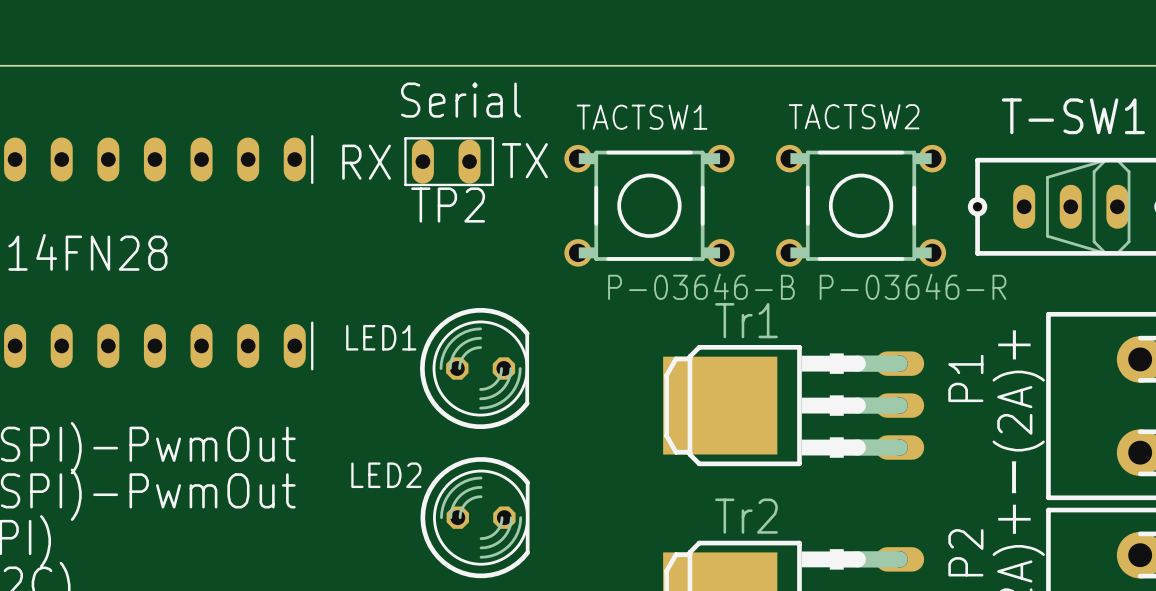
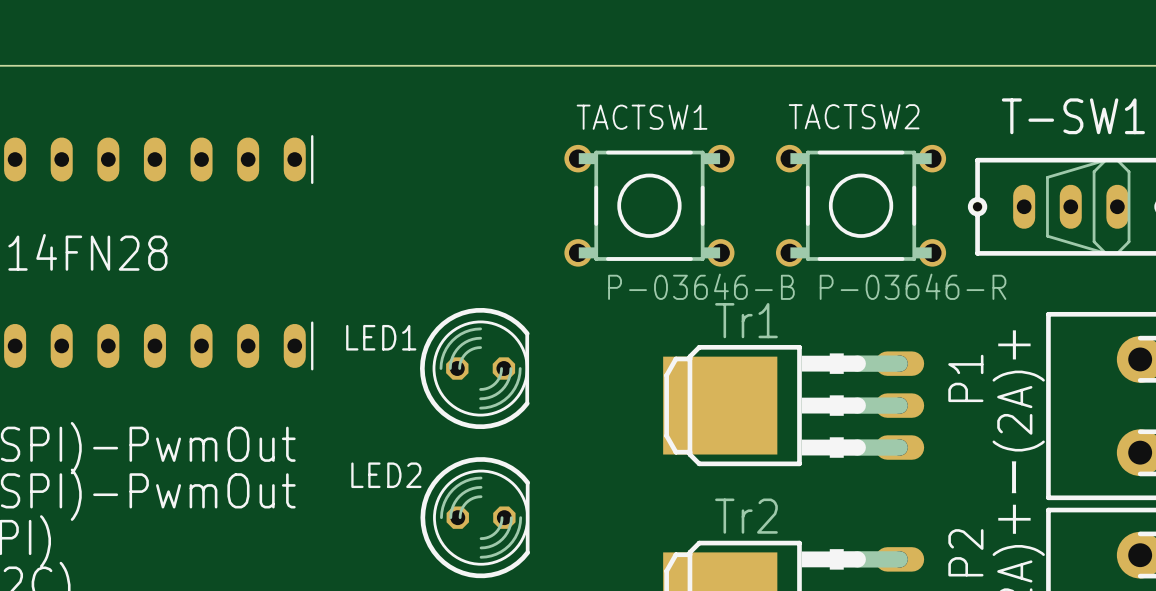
text: Serial (461, 100) -> none
text: TX (524, 160) -> none
part: (449, 161) -> none
text: RX (366, 162) -> none
text: TP2 (448, 205) -> none

